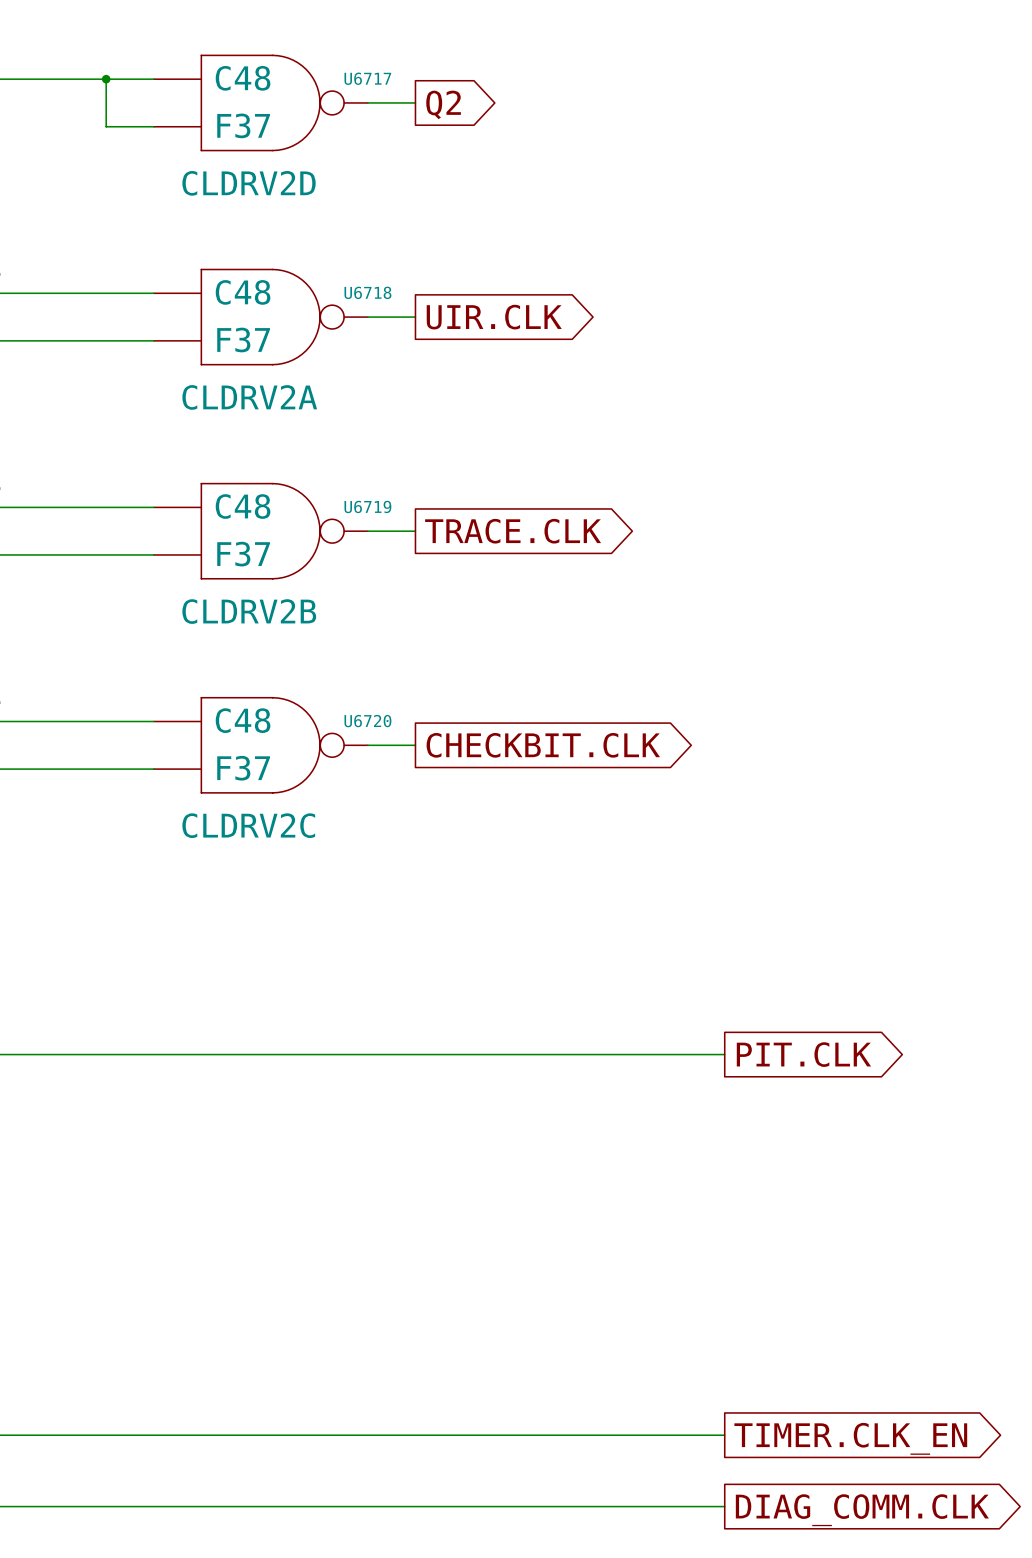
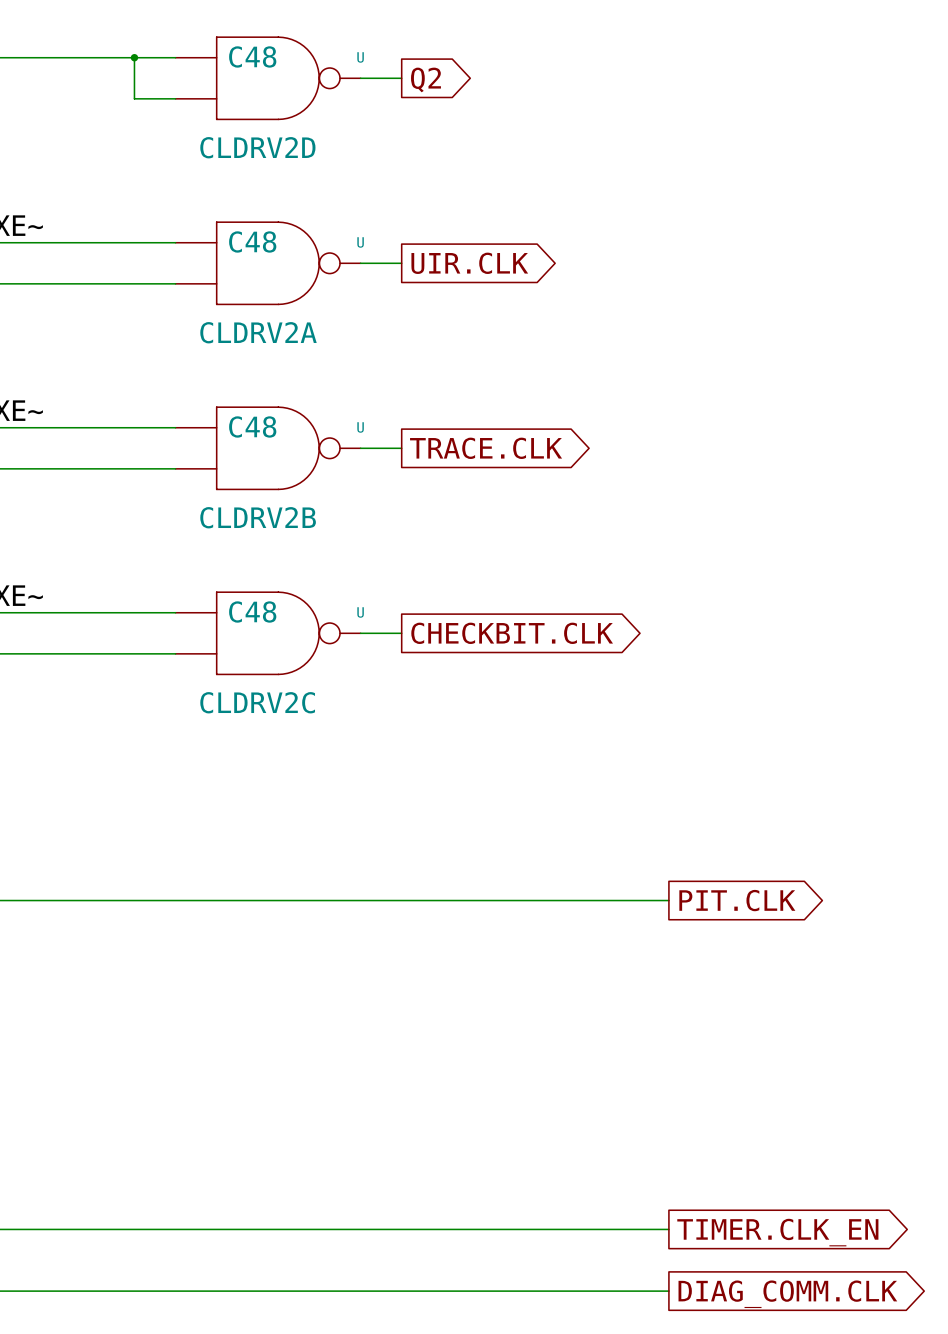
U6717 name: U6717 (367, 78) -> U (360, 57)
U6717 value: F37 (243, 125) -> none
U6718 name: U6718 (367, 292) -> U (360, 242)
U6718 value: F37 (243, 340) -> none
U6719 name: U6719 (367, 506) -> U (360, 427)
U6719 value: F37 (243, 554) -> none
U6720 name: U6720 (367, 721) -> U (360, 612)
U6720 value: F37 (243, 768) -> none

